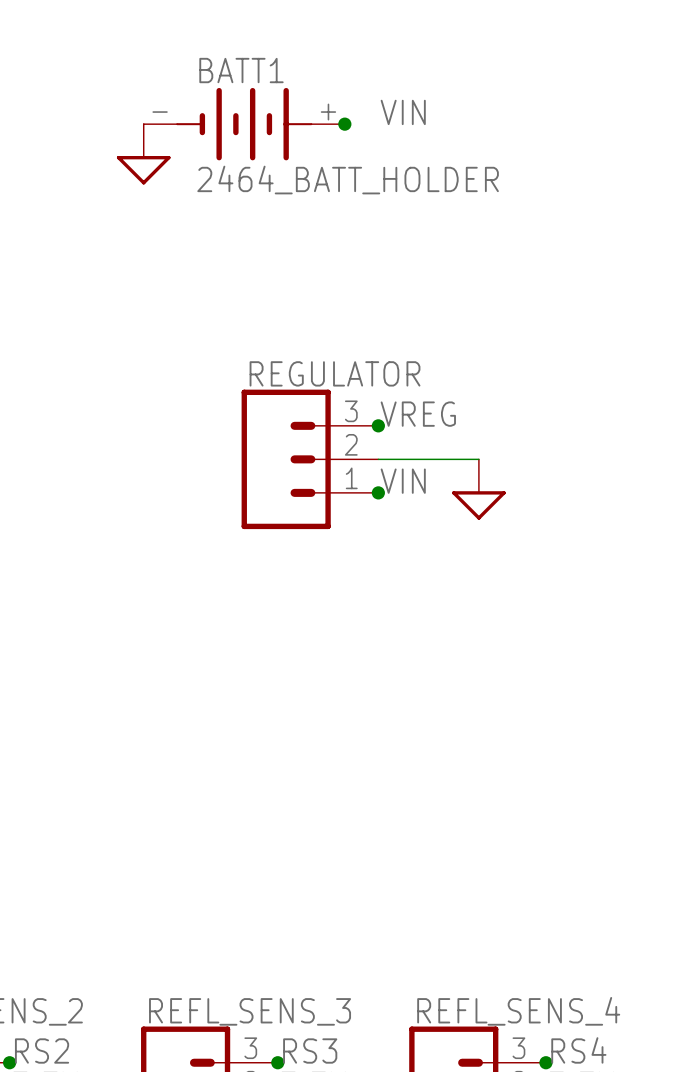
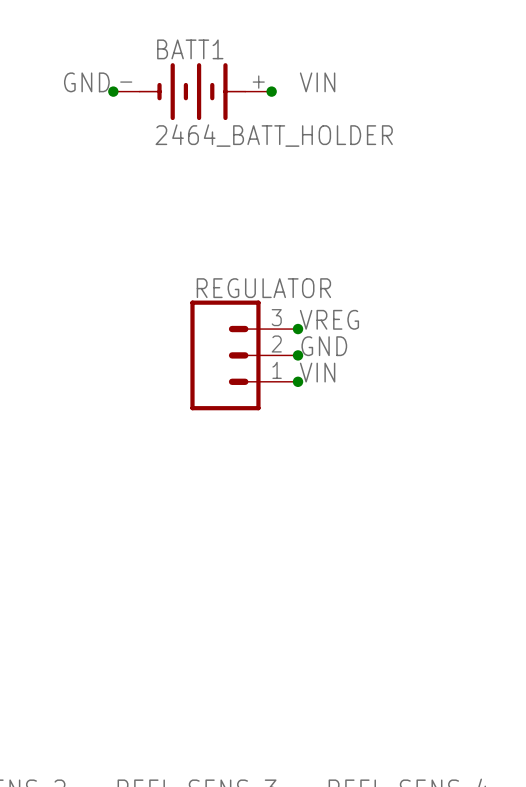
label: none -> GND (86, 82)
junction: none -> (113, 91)
power symbol: (143, 154) -> none
label: none -> GND (324, 346)
wire: (378, 459) (478, 459) -> none
junction: none -> (298, 355)
power symbol: (478, 489) -> none

